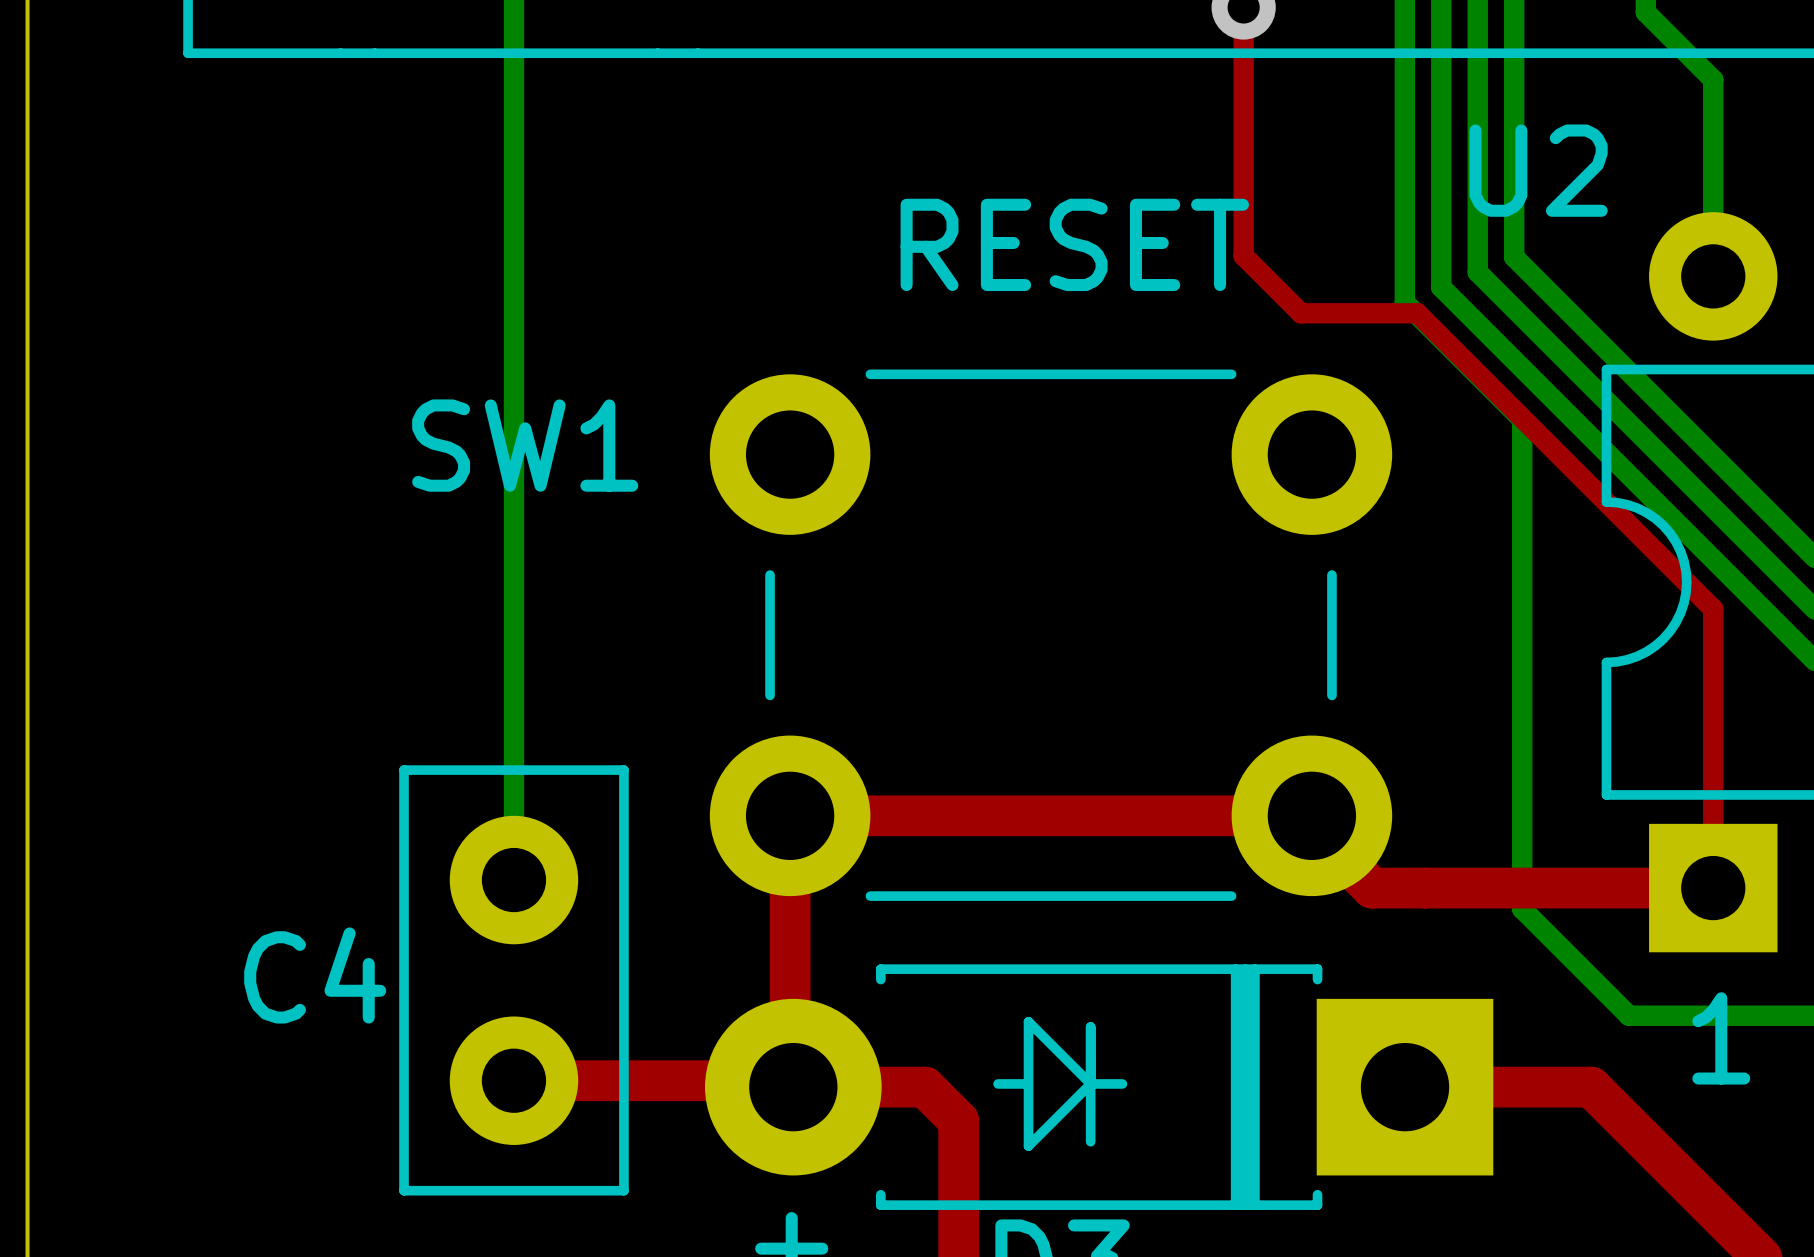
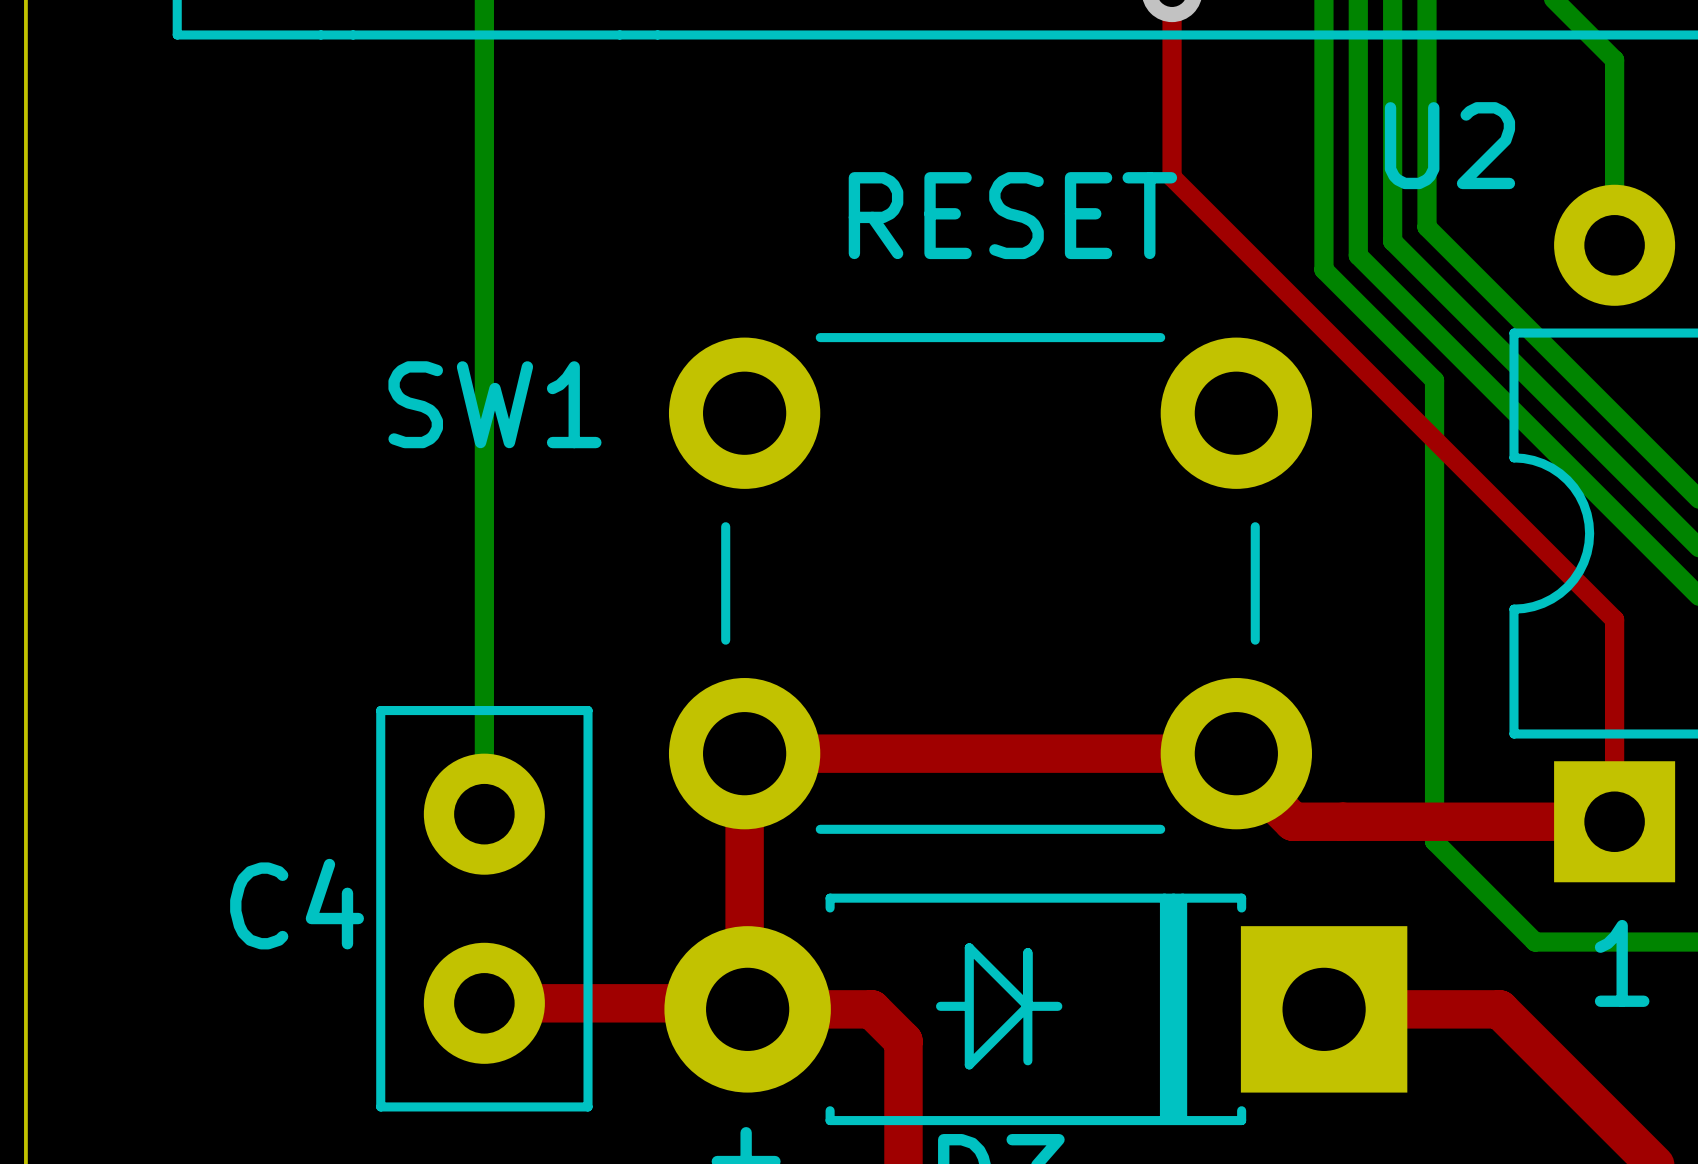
top track: (1243, 204) (1243, 255) (1301, 313) (1417, 313) (1713, 609) (1713, 673) -> (1172, 177) (1614, 619)

